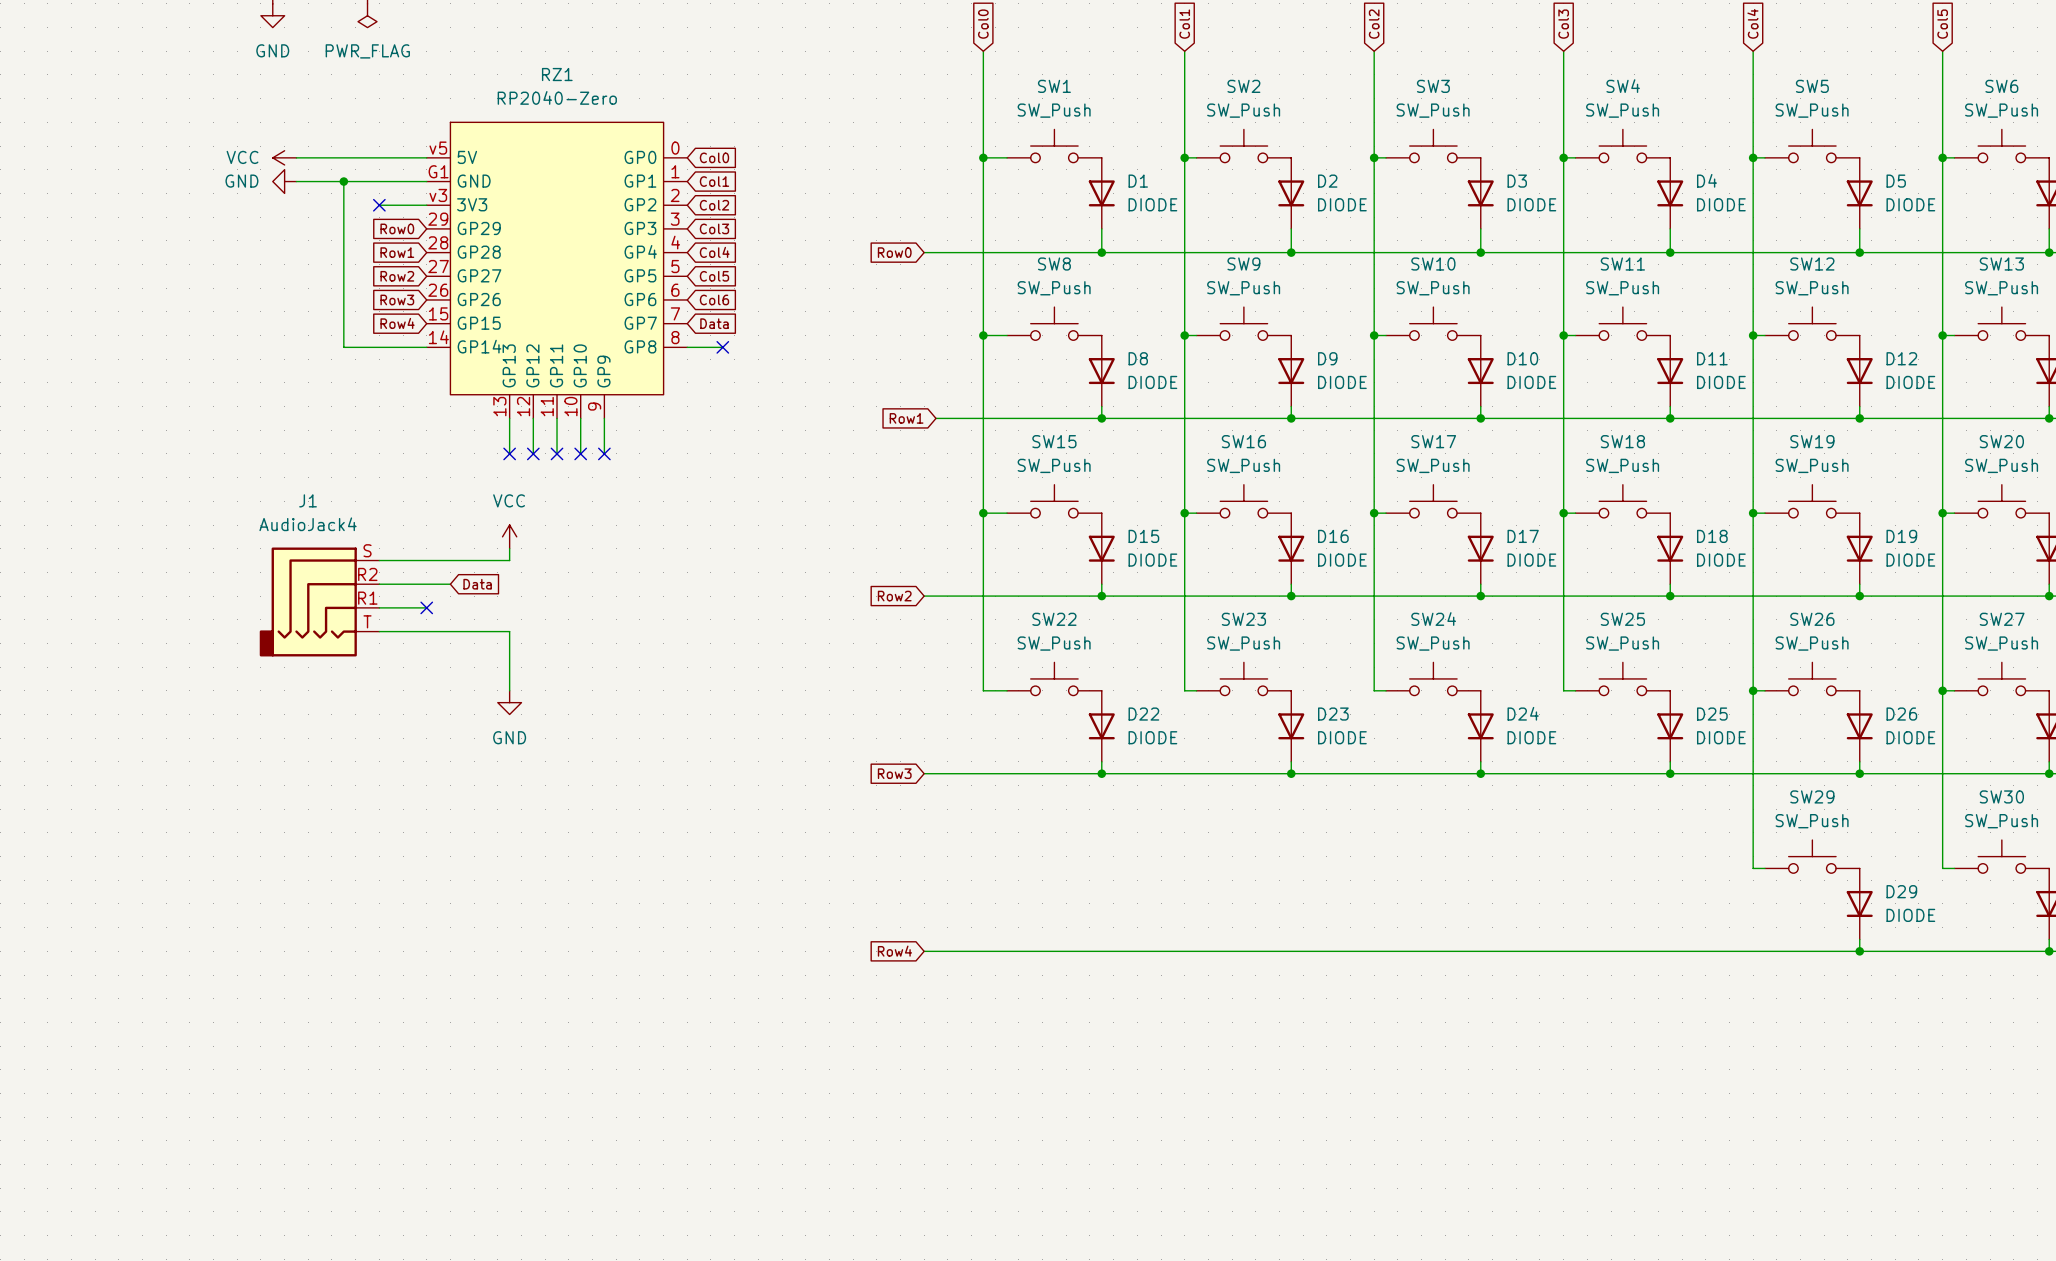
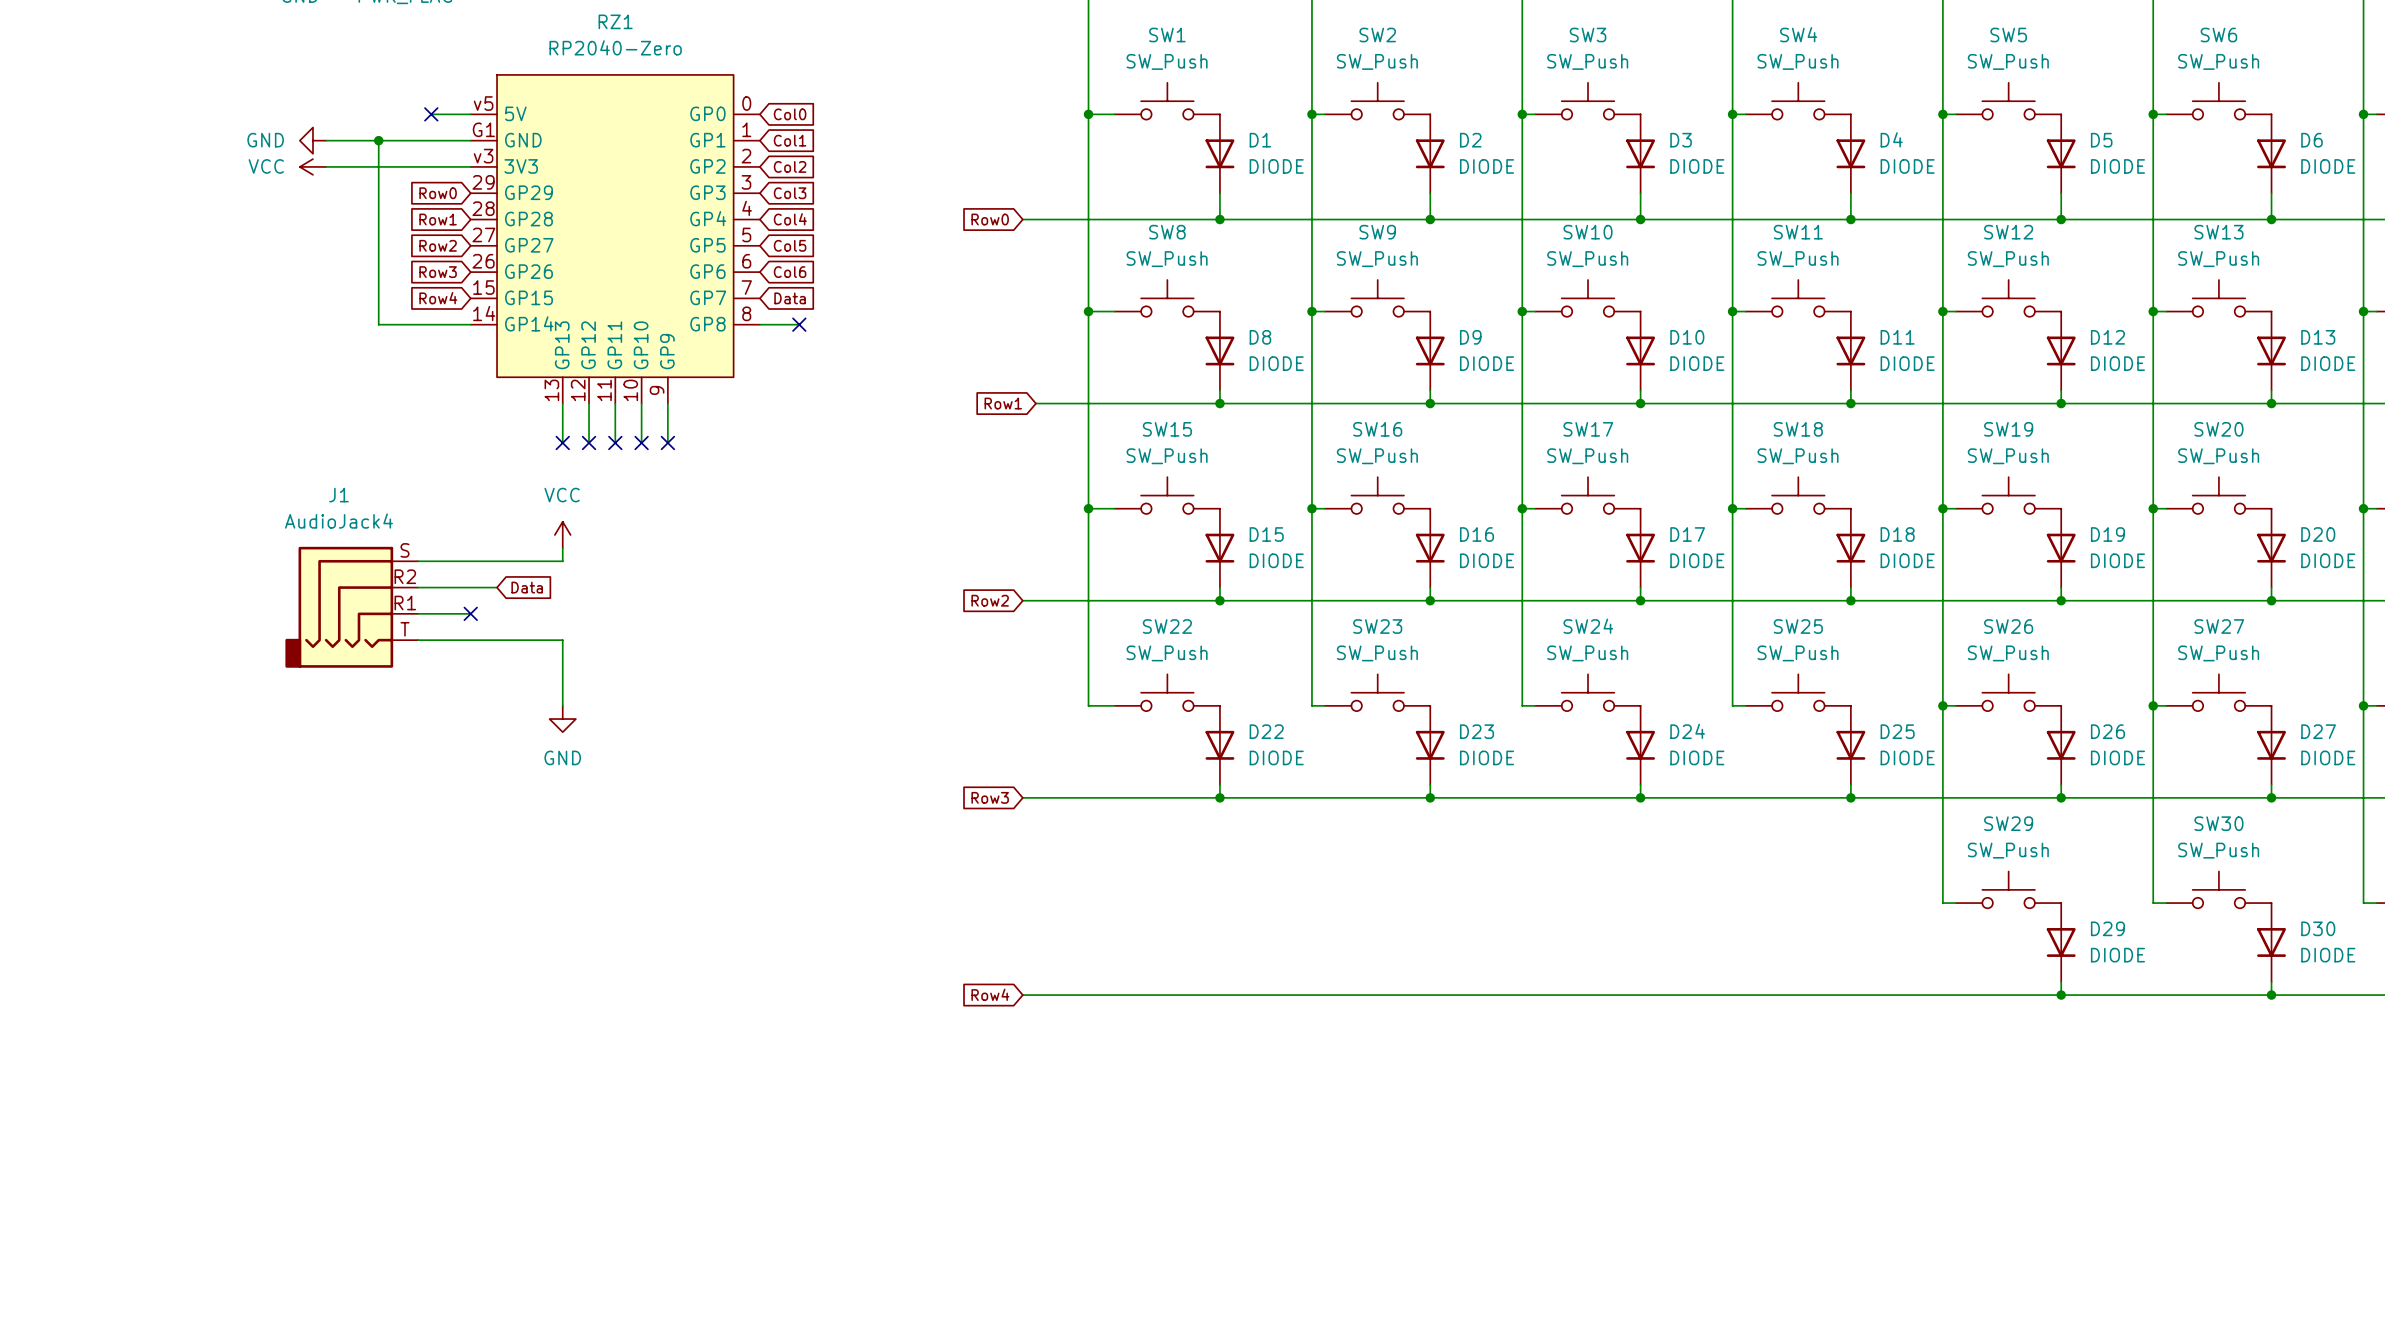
power symbol position: VCC (284, 157) -> VCC (312, 166)
wire: (296, 157) (391, 157) -> none
wire: none -> (326, 166) (418, 166)
no-connect mark position: (379, 205) -> (431, 114)

